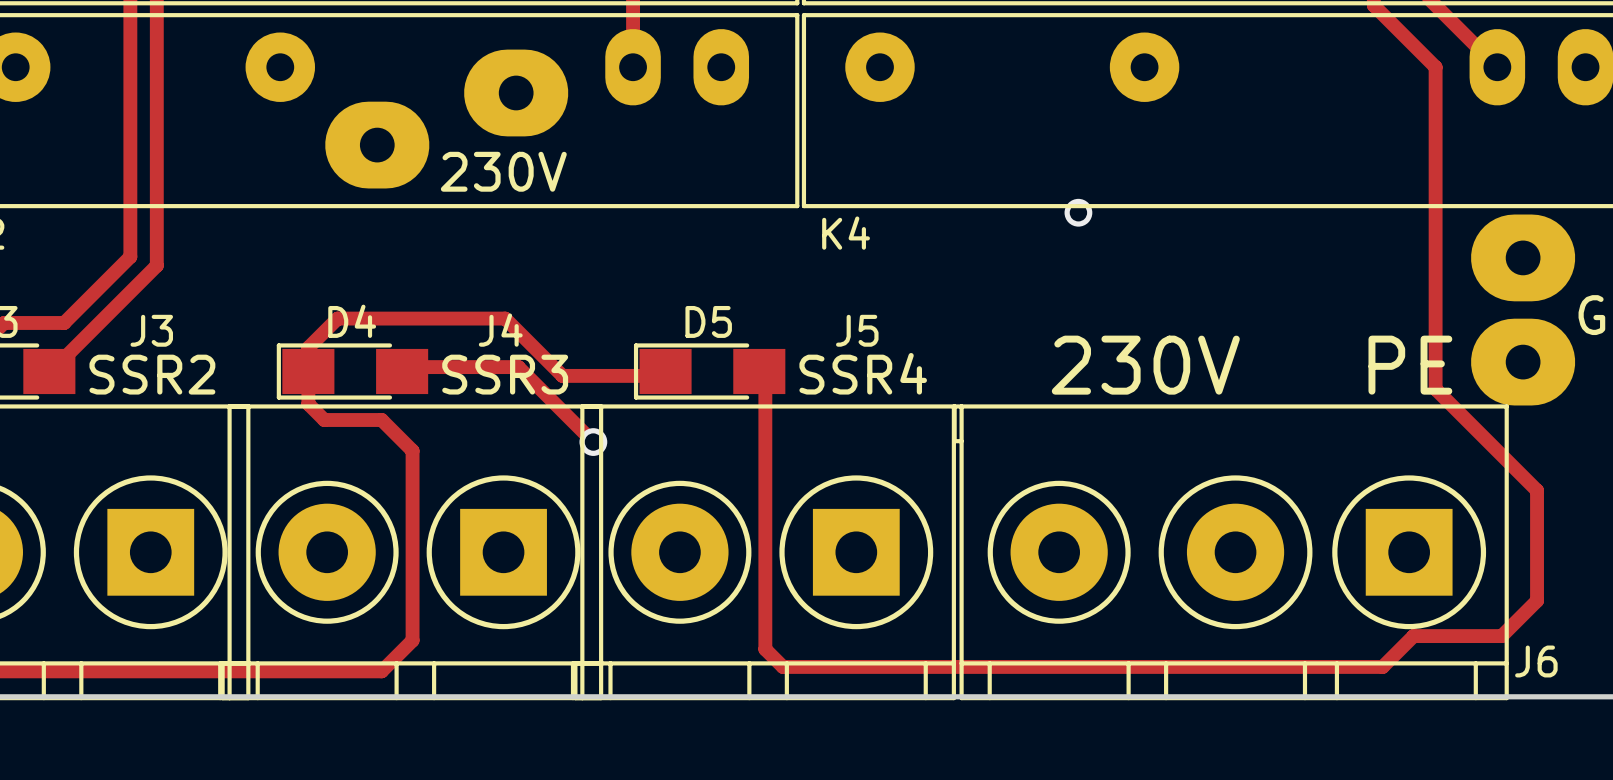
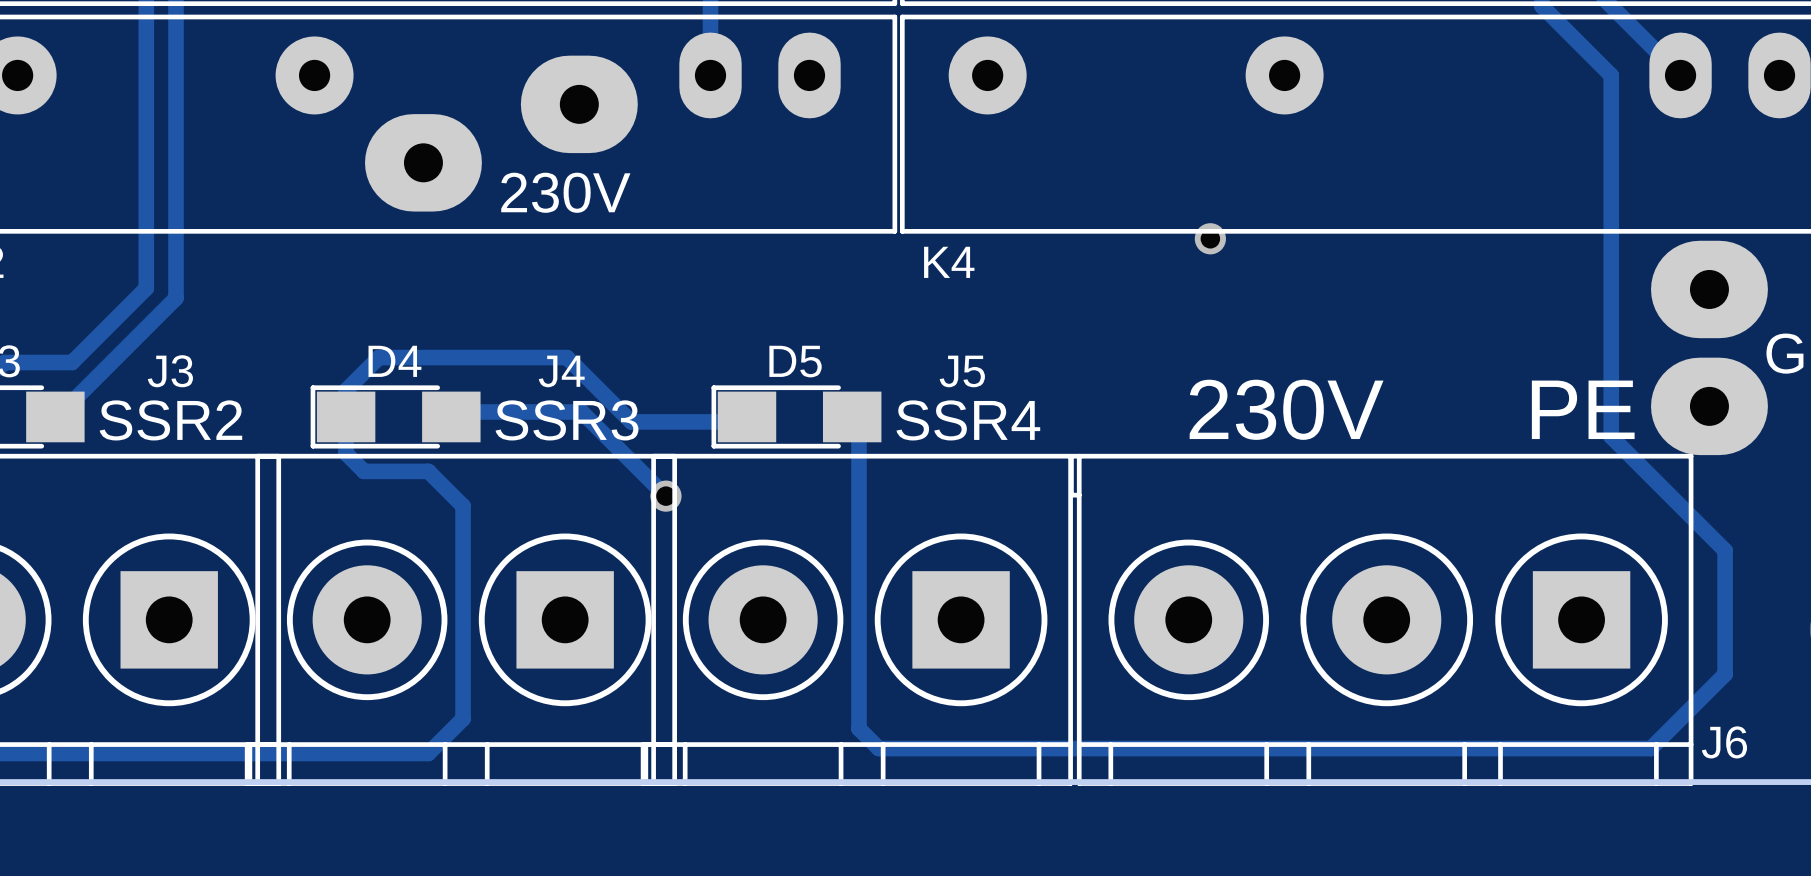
track: (1501, 636) (1413, 636) (1382, 666) -> (1685, 713) (1650, 748) (1551, 748)

